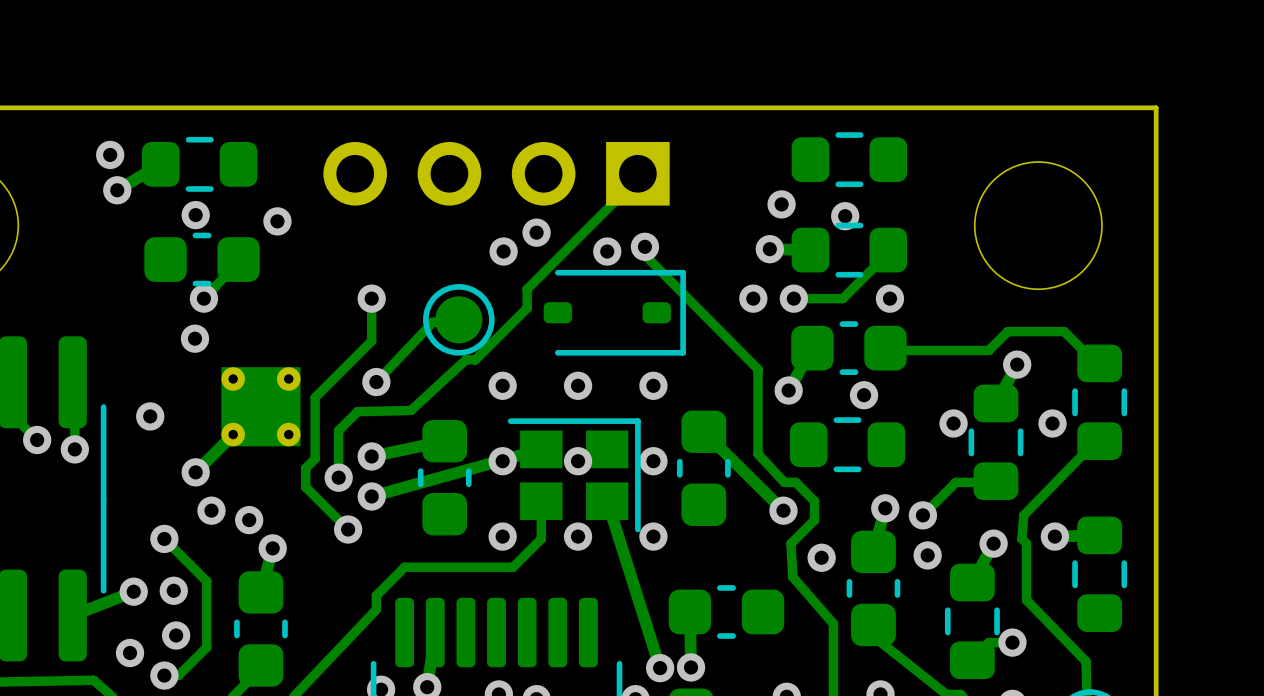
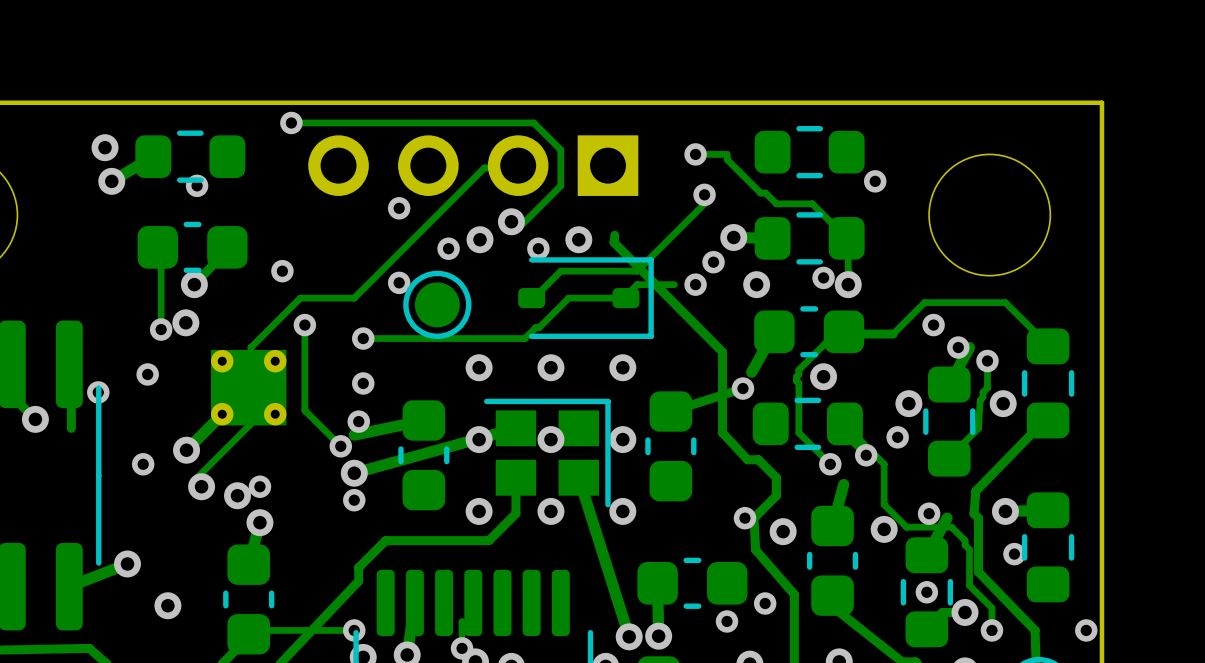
track: none -> (291, 122) (533, 122) (560, 149) (560, 185) (515, 230)
via: none -> (291, 122)
track: none -> (695, 154) (727, 154) (727, 159) (760, 193) (765, 193) (776, 203) (812, 203) (846, 238) (848, 271) (852, 275)
via: none -> (695, 154)
track: none -> (518, 165) (515, 167) (484, 167) (354, 298) (300, 298) (250, 347) (250, 369) (264, 383) (264, 392) (250, 405) (250, 423) (197, 477)
track: (637, 173) (635, 180) (527, 289) (527, 308) (475, 359) (465, 359) (411, 410) (357, 411) (338, 430) (338, 477) -> none
via: none -> (875, 181)
track: none -> (704, 194) (704, 203) (637, 271) (560, 271) (533, 298) (531, 298)
via: none -> (704, 194)
via: (781, 204) -> none
via position: (195, 215) -> (197, 185)
via: (845, 216) -> none
via: none -> (399, 208)
via: (277, 221) -> none
via: (644, 246) -> none
track: (888, 250) (885, 256) (842, 298) (793, 298) -> none
track: none -> (157, 247) (161, 250) (161, 329)
via: none -> (448, 248)
via: none -> (538, 248)
via: none -> (713, 262)
via: none -> (282, 271)
via: none -> (823, 277)
via: none -> (399, 282)
track: (371, 298) (371, 341) (315, 397) (315, 458) (305, 468) (305, 487) (348, 529) -> none
via: (371, 298) -> none
track: none -> (674, 284) (637, 284) (628, 293)
via: none -> (695, 284)
via: (753, 298) -> none
track: none -> (625, 298) (568, 298) (539, 327) (535, 327) (524, 338) (363, 338)
track: (458, 319) (456, 322) (432, 322) (376, 382) -> none
track: none -> (304, 325) (304, 410) (340, 446)
via: none -> (304, 325)
via: none -> (933, 325)
via: none -> (161, 329)
track: none -> (846, 331) (834, 334) (798, 369) (796, 376) (798, 383) (798, 432) (830, 464)
track: (937, 350) (988, 350) (1007, 331) (1064, 331) (1092, 359) (1097, 361) -> (893, 334) (924, 302) (1005, 302) (1045, 344)
via: none -> (363, 338)
via: none -> (958, 347)
via: (1017, 364) -> none
via: none -> (987, 360)
via position: (376, 382) -> (363, 383)
via position: (788, 390) -> (743, 388)
via: none -> (98, 392)
via position: (150, 416) -> (147, 374)
track: (703, 431) (783, 510) -> (670, 411) (743, 388)
via: none -> (358, 421)
via: (74, 449) -> none
via: (371, 456) -> none
via: none -> (897, 437)
via: none -> (340, 446)
via: (338, 477) -> none
track: none -> (866, 455) (843, 432) (844, 423) (884, 464) (884, 504) (906, 527) (951, 527) (965, 540) (965, 545) (969, 549) (969, 585) (991, 607) (991, 630)
via: none -> (866, 455)
track: (995, 481) (955, 482) (922, 515) -> (949, 458) (978, 428) (980, 400) (982, 392) (987, 387) (987, 360)
via: none -> (143, 464)
via position: (885, 508) -> (830, 464)
via: none -> (259, 486)
via: (783, 510) -> none
via: (922, 515) -> none
via position: (348, 529) -> (354, 500)
track: (164, 538) (206, 581) (206, 647) (178, 675) (164, 675) -> none
via: (164, 538) -> none
via: none -> (744, 518)
via position: (993, 543) -> (929, 513)
via: none -> (1014, 554)
via: (173, 590) -> none
via: none -> (926, 592)
via: none -> (765, 603)
track: none -> (462, 621) (462, 648)
via: none -> (727, 621)
via: (130, 653) -> none
track: none -> (354, 630) (252, 630)
via: none -> (354, 630)
via: none -> (991, 630)
via: none -> (1086, 630)
via: (164, 675) -> none
via: none -> (462, 648)

